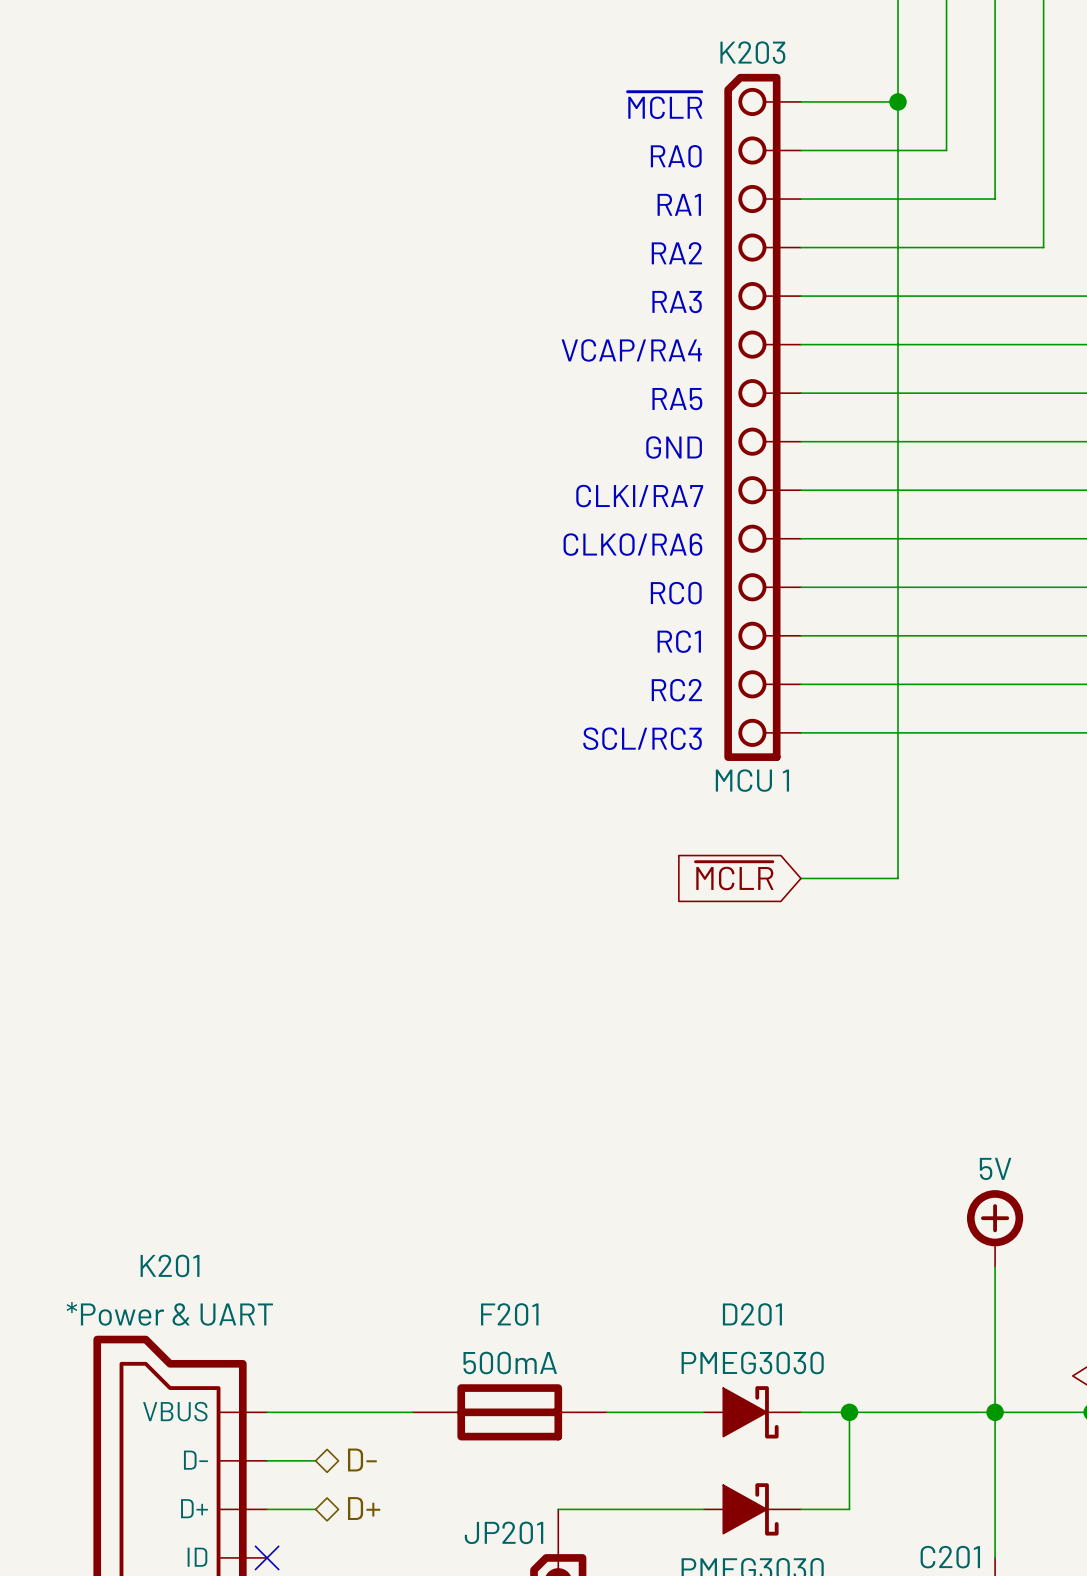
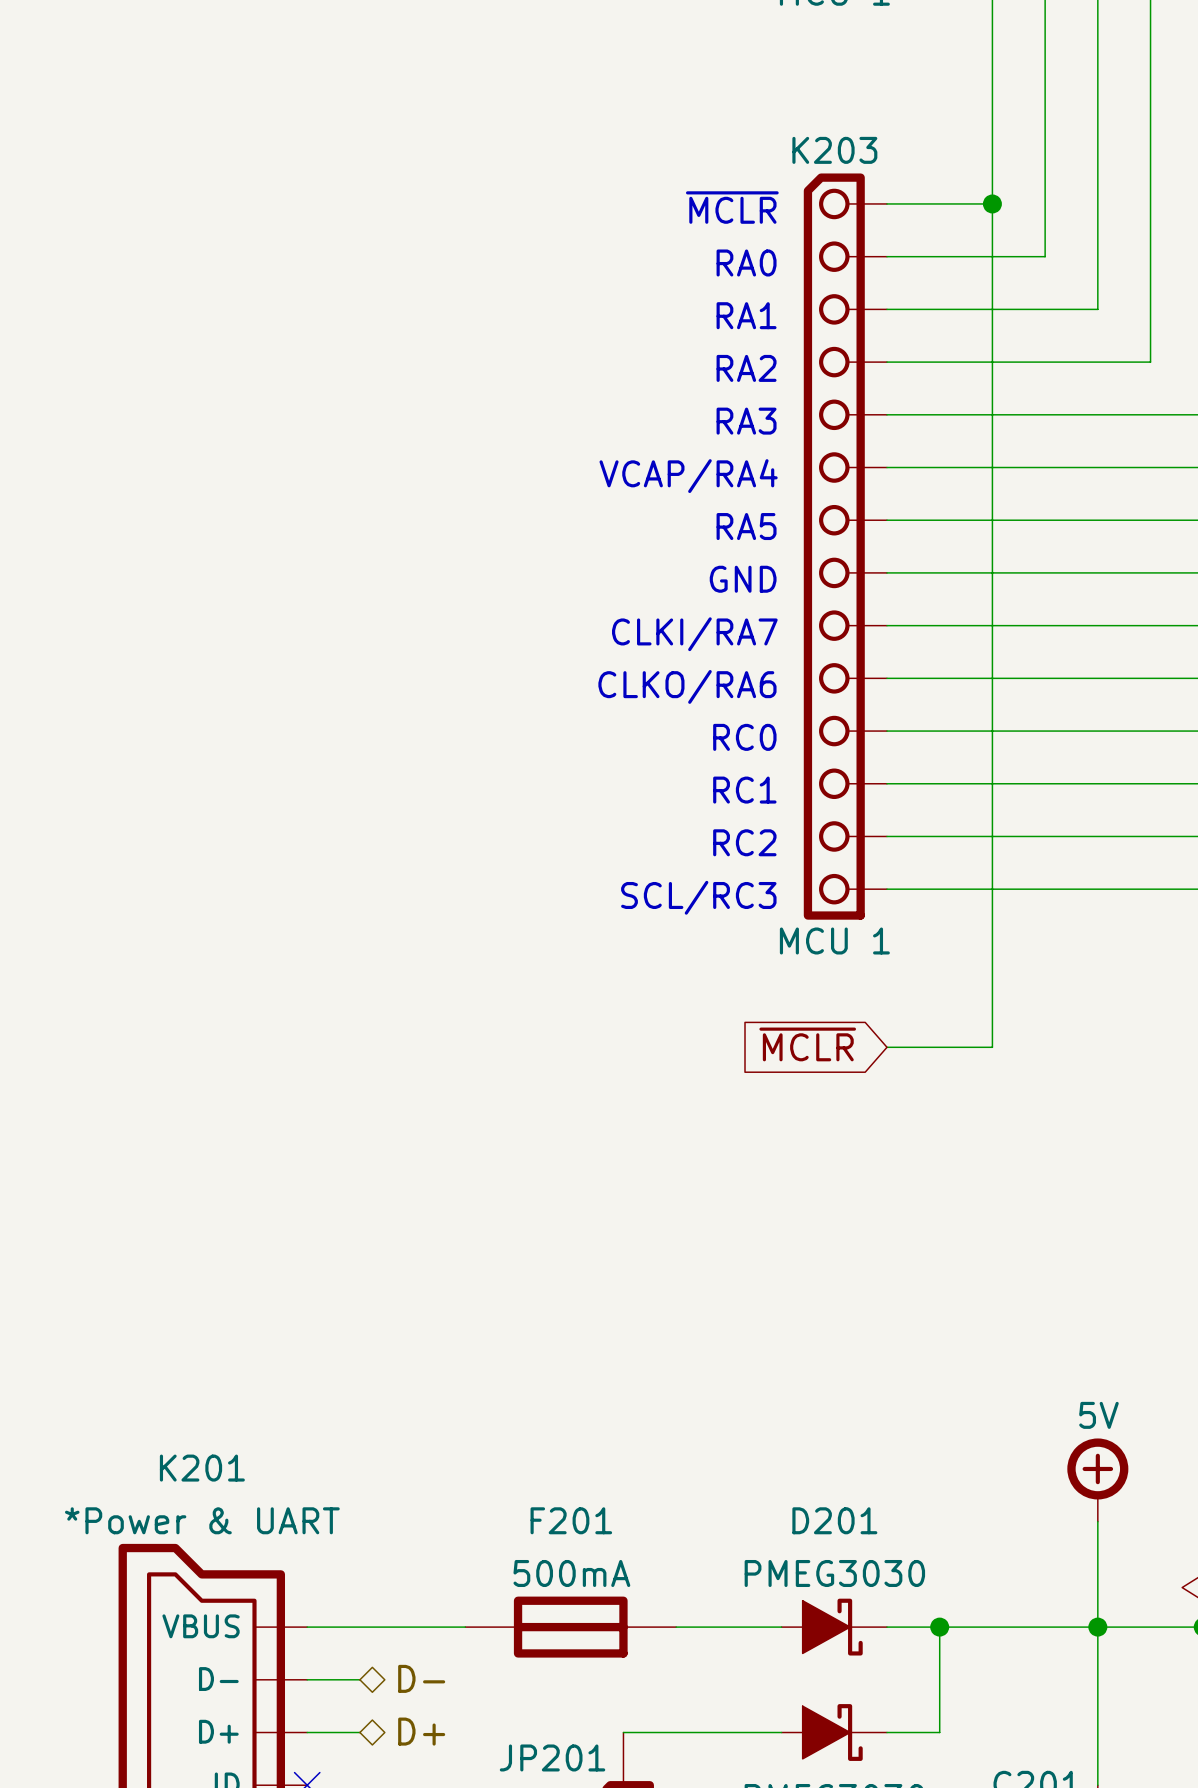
power symbol position: (995, 1228) -> (1097, 1480)

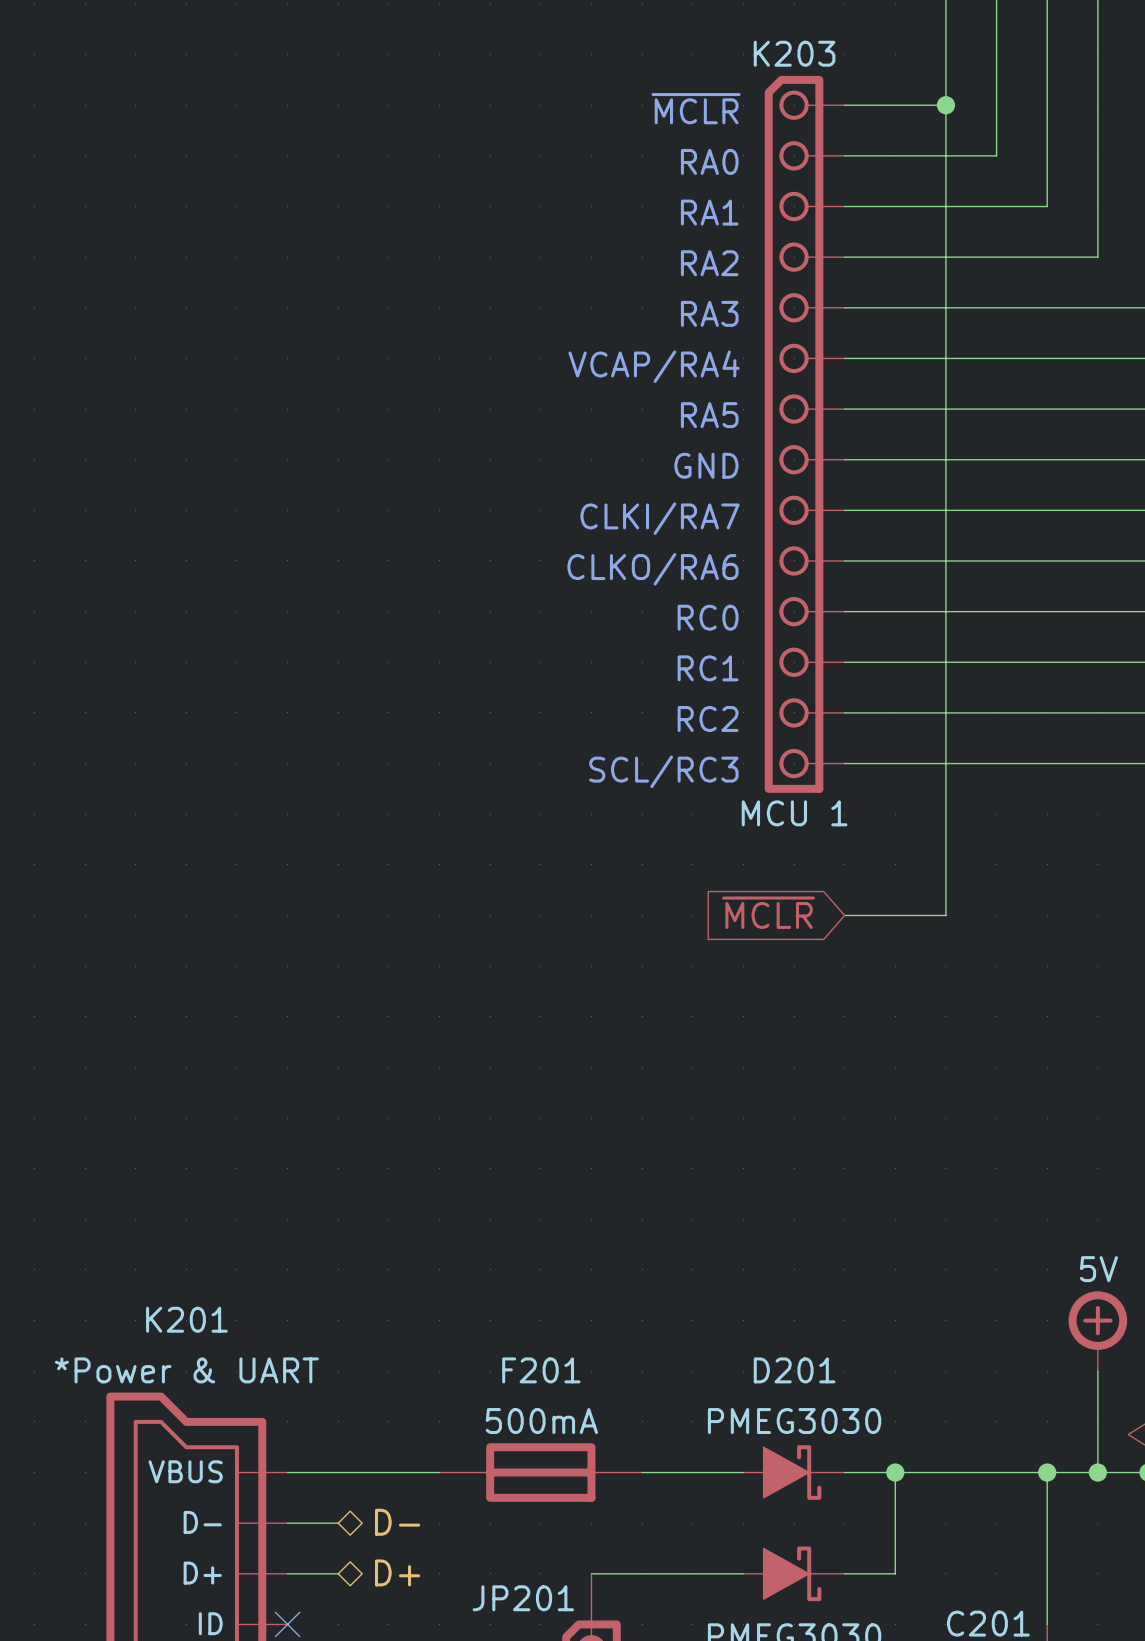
power symbol position: (1097, 1480) -> (1097, 1331)
wire: (1097, 1521) (1097, 1627) -> (1097, 1371) (1097, 1472)
junction: none -> (1097, 1472)

